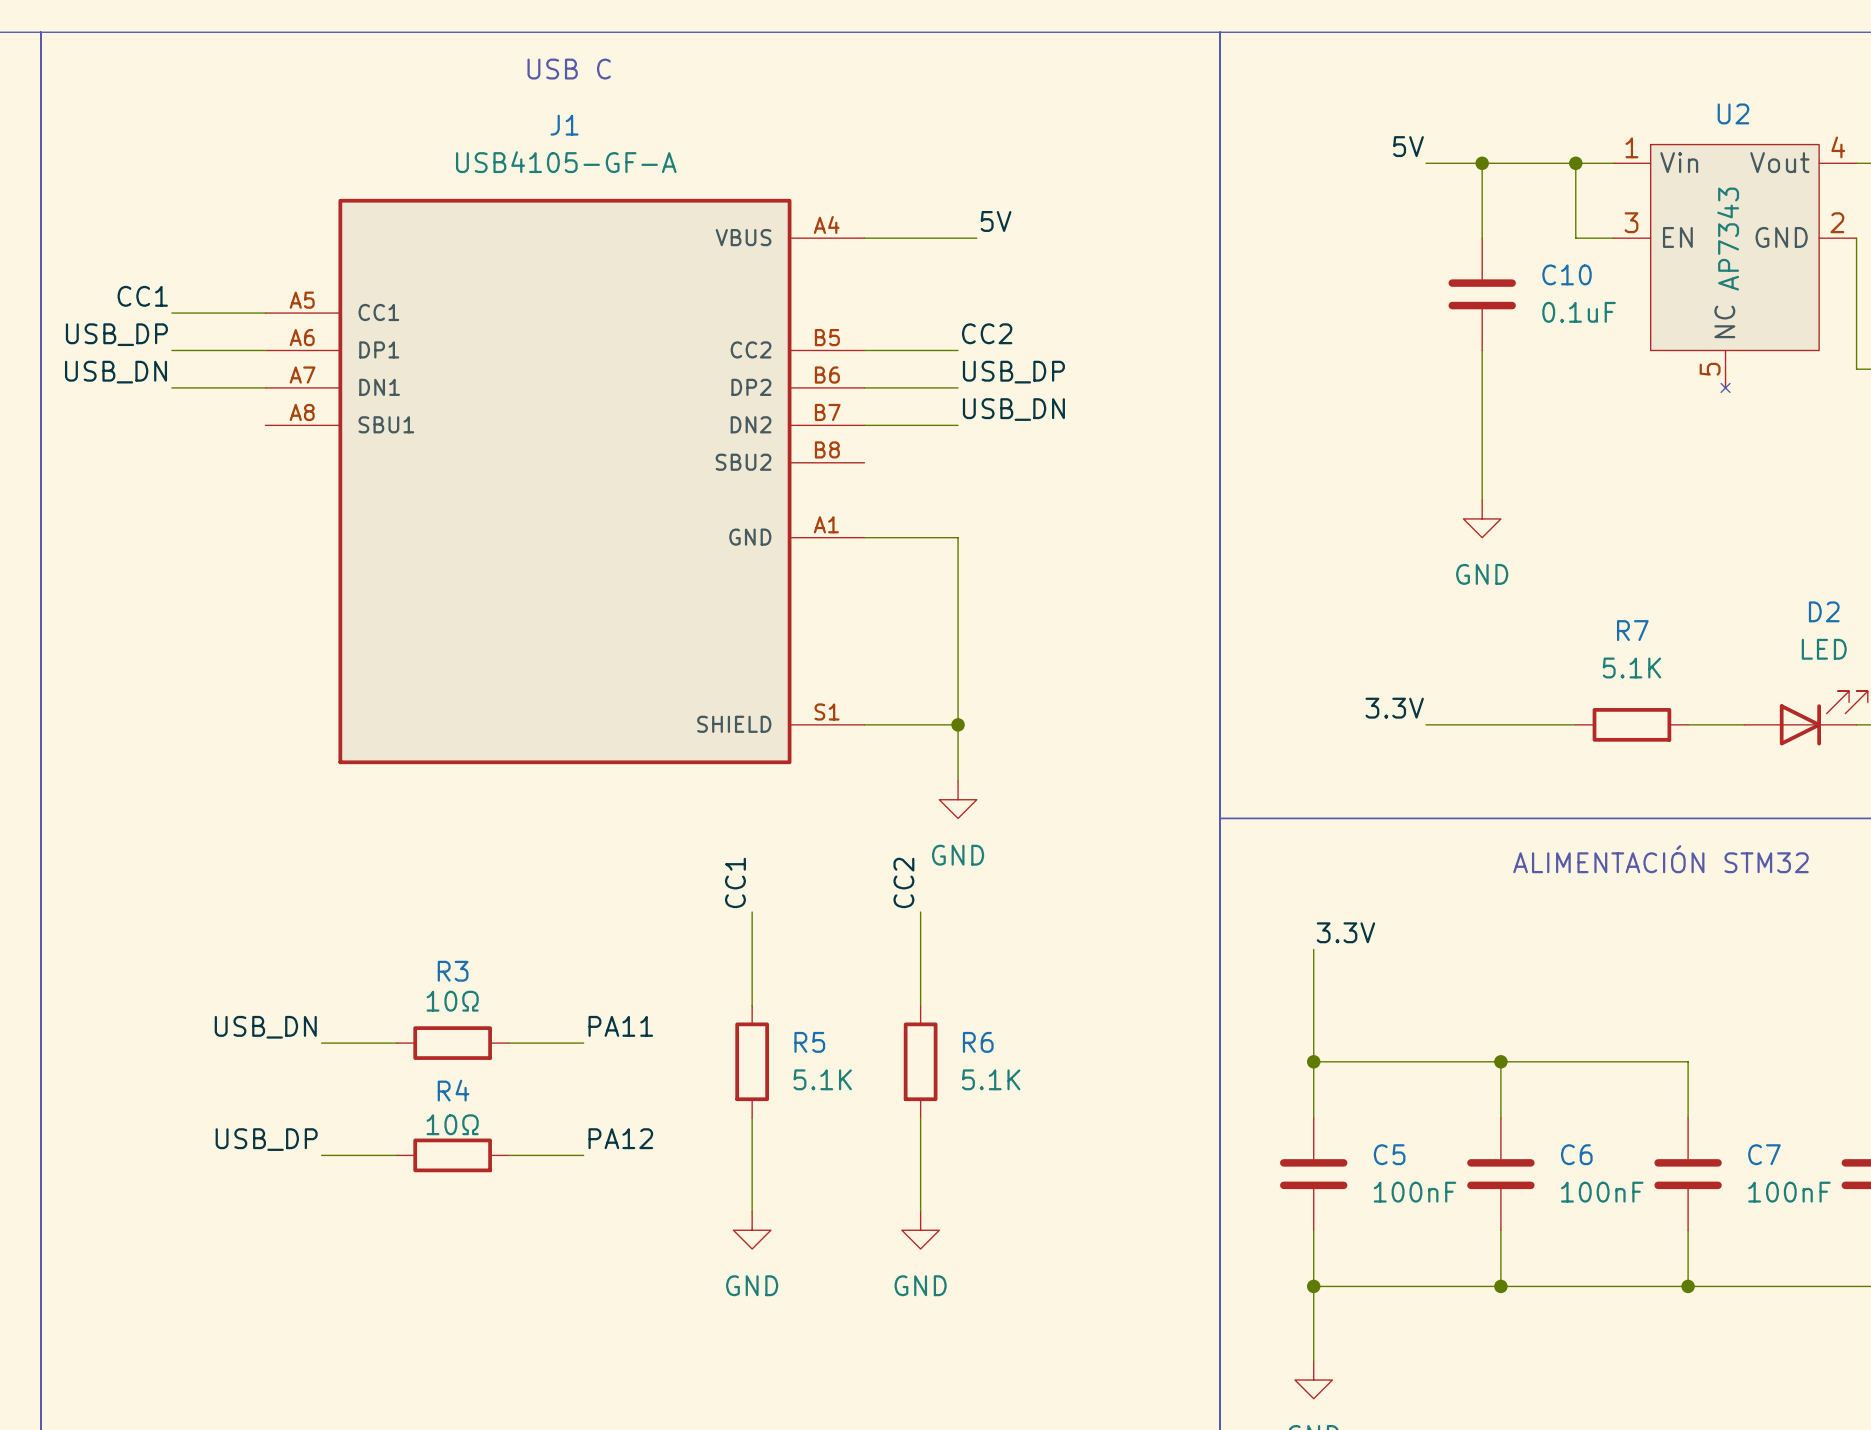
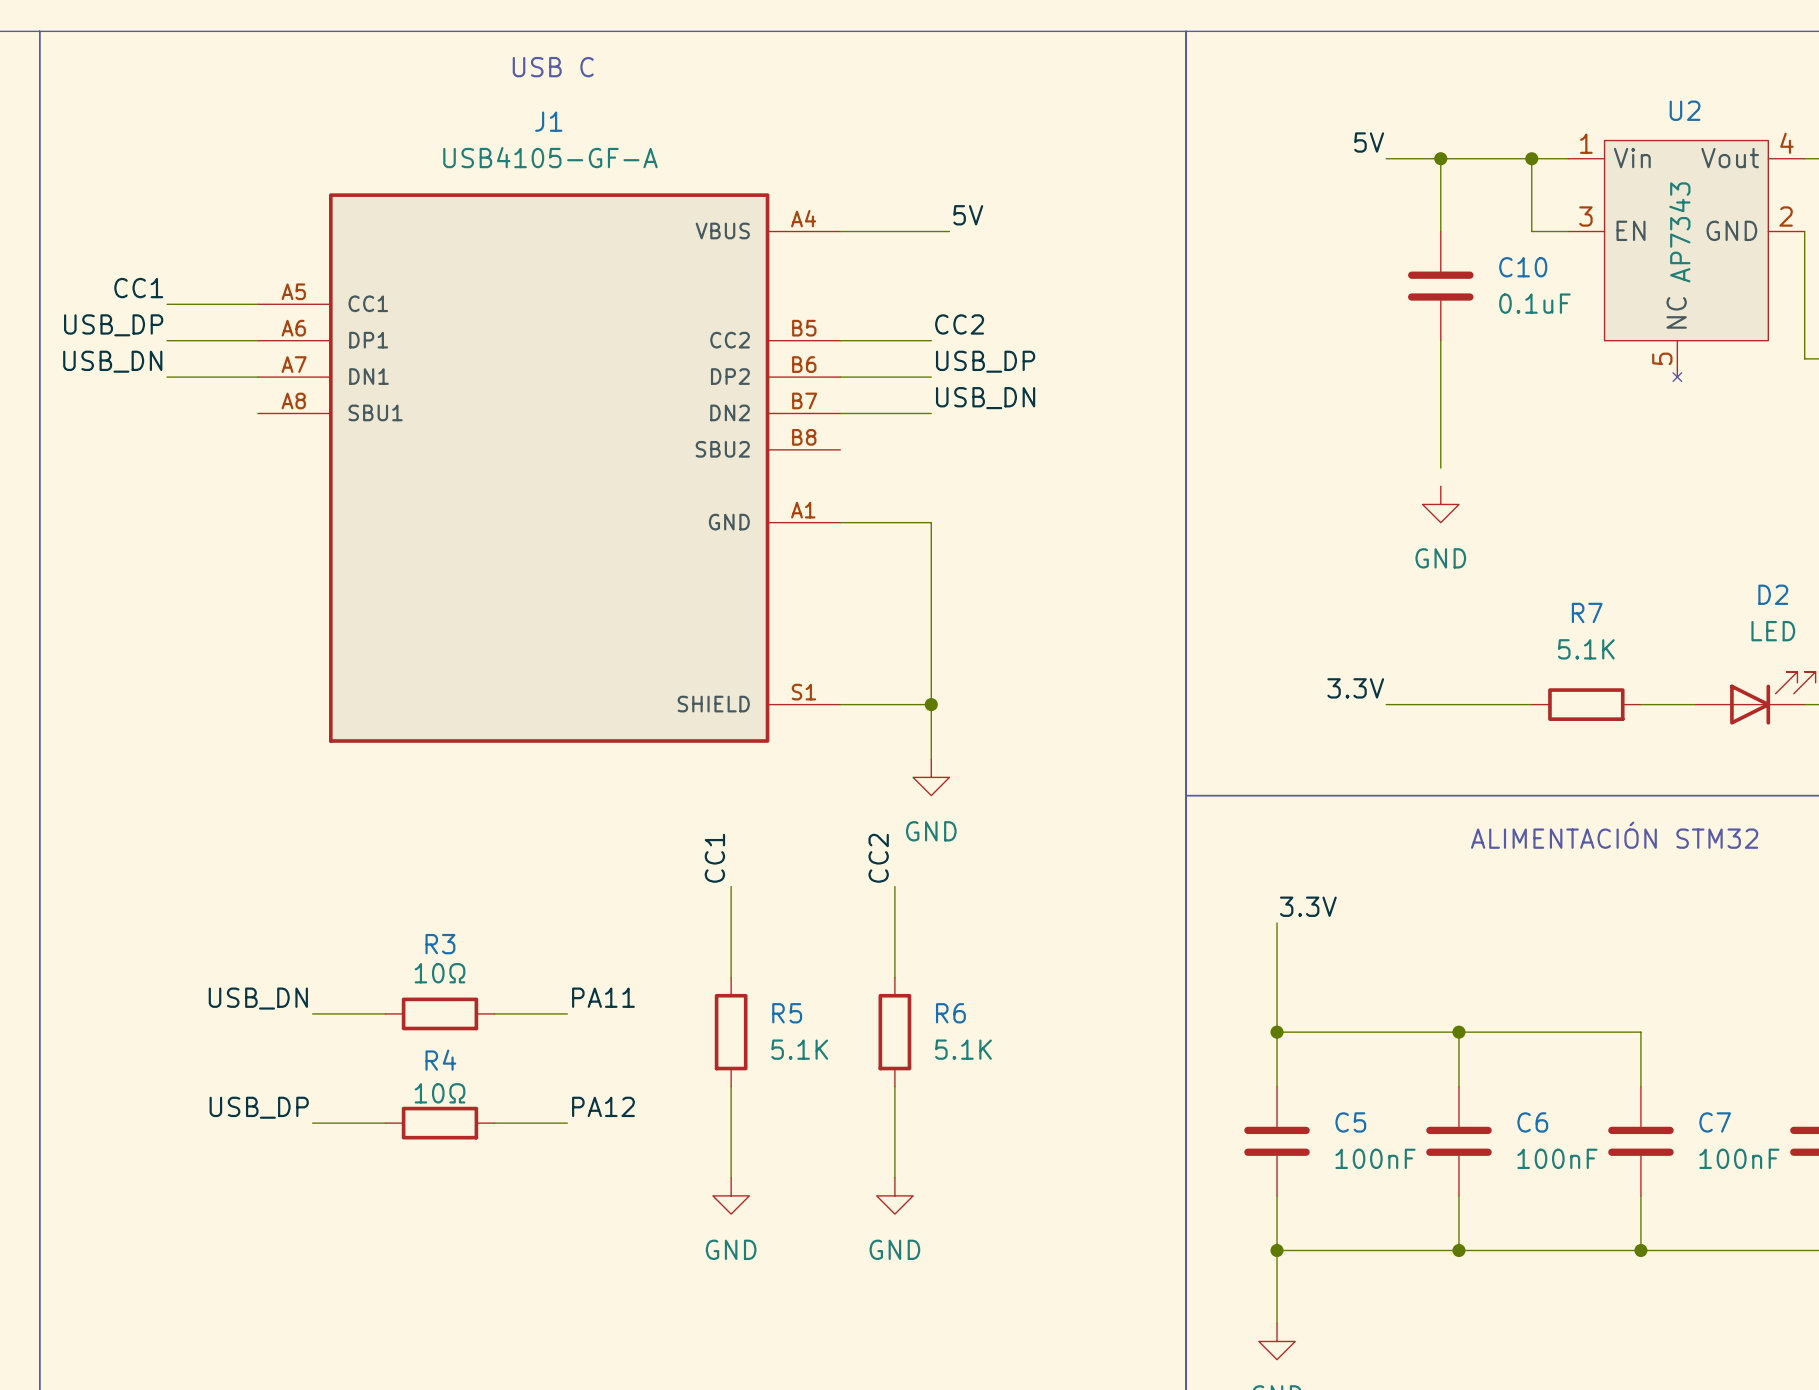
wire: (1482, 481) (1482, 500) -> none

